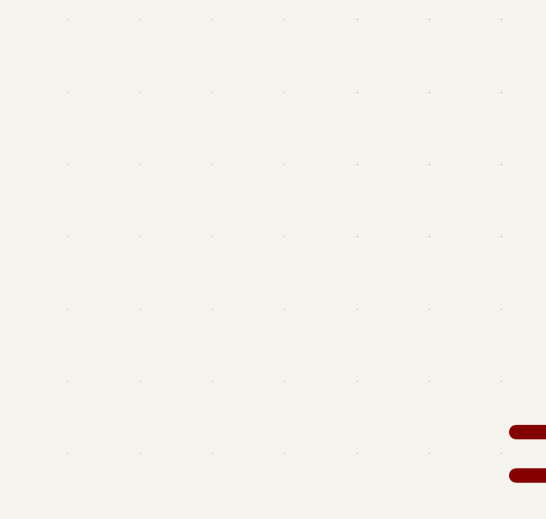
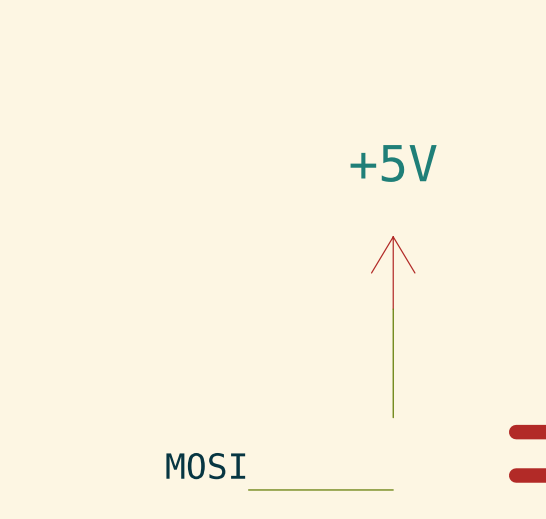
power symbol: none -> +5V (393, 272)
wire: none -> (393, 309) (393, 417)
label: none -> MOSI (205, 466)
wire: none -> (248, 489) (393, 489)

